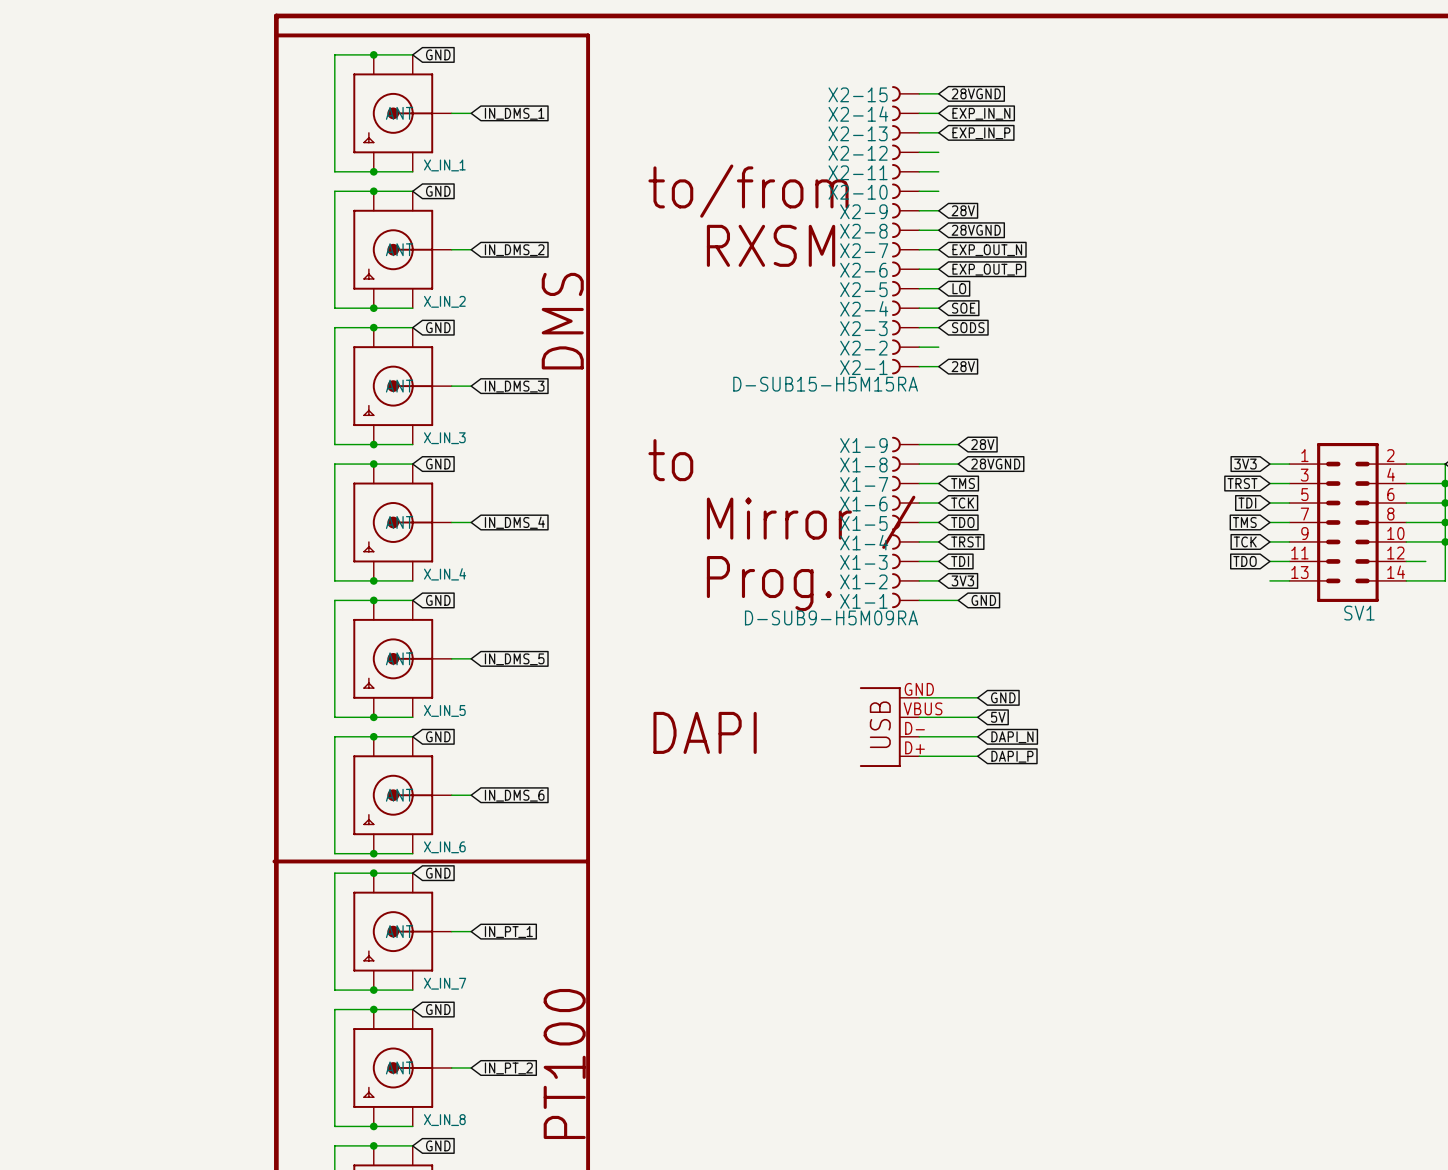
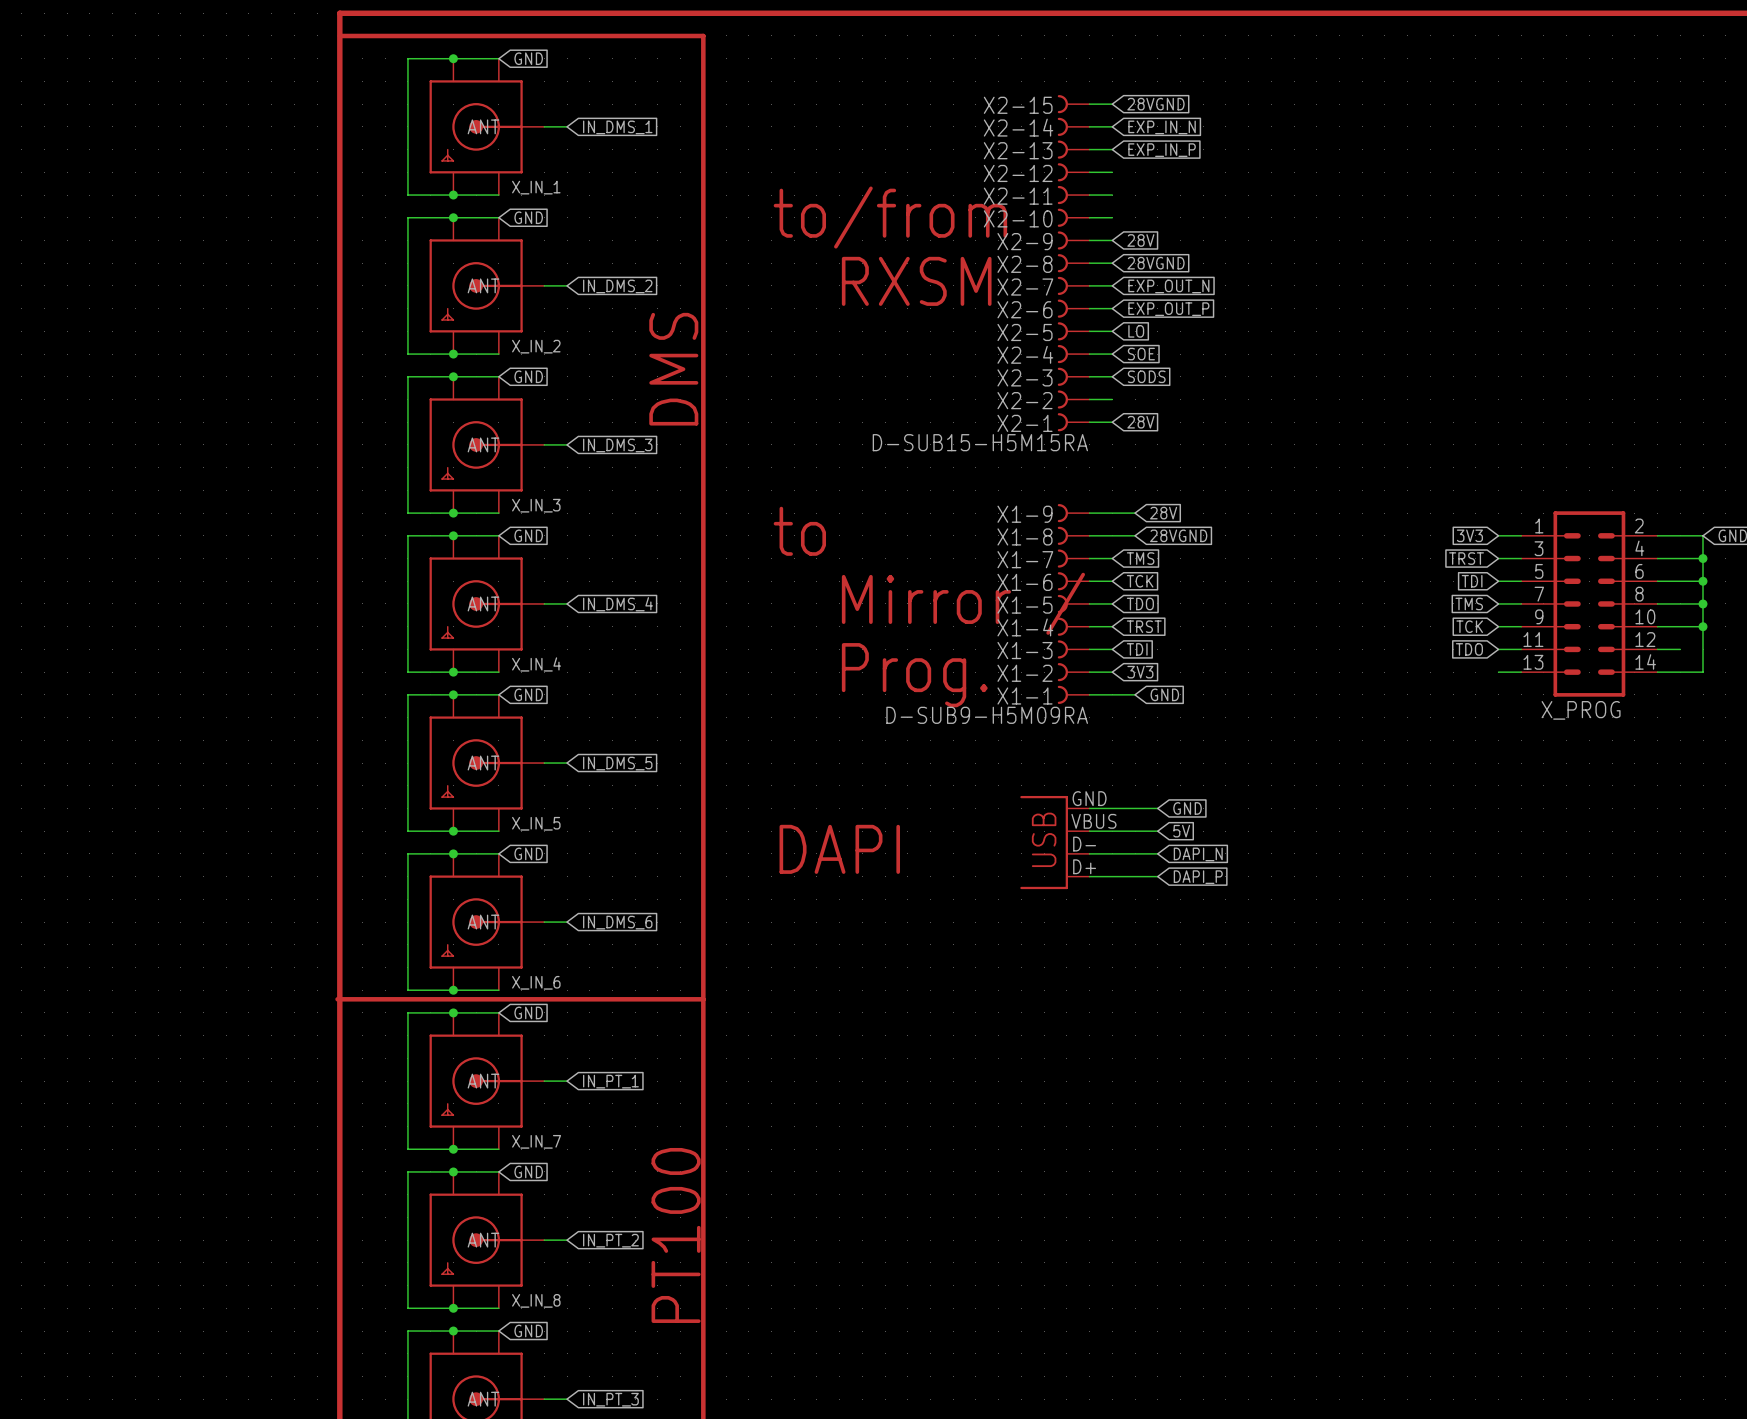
SV1 name: SV1 (1359, 613) -> X_PROG (1581, 710)

